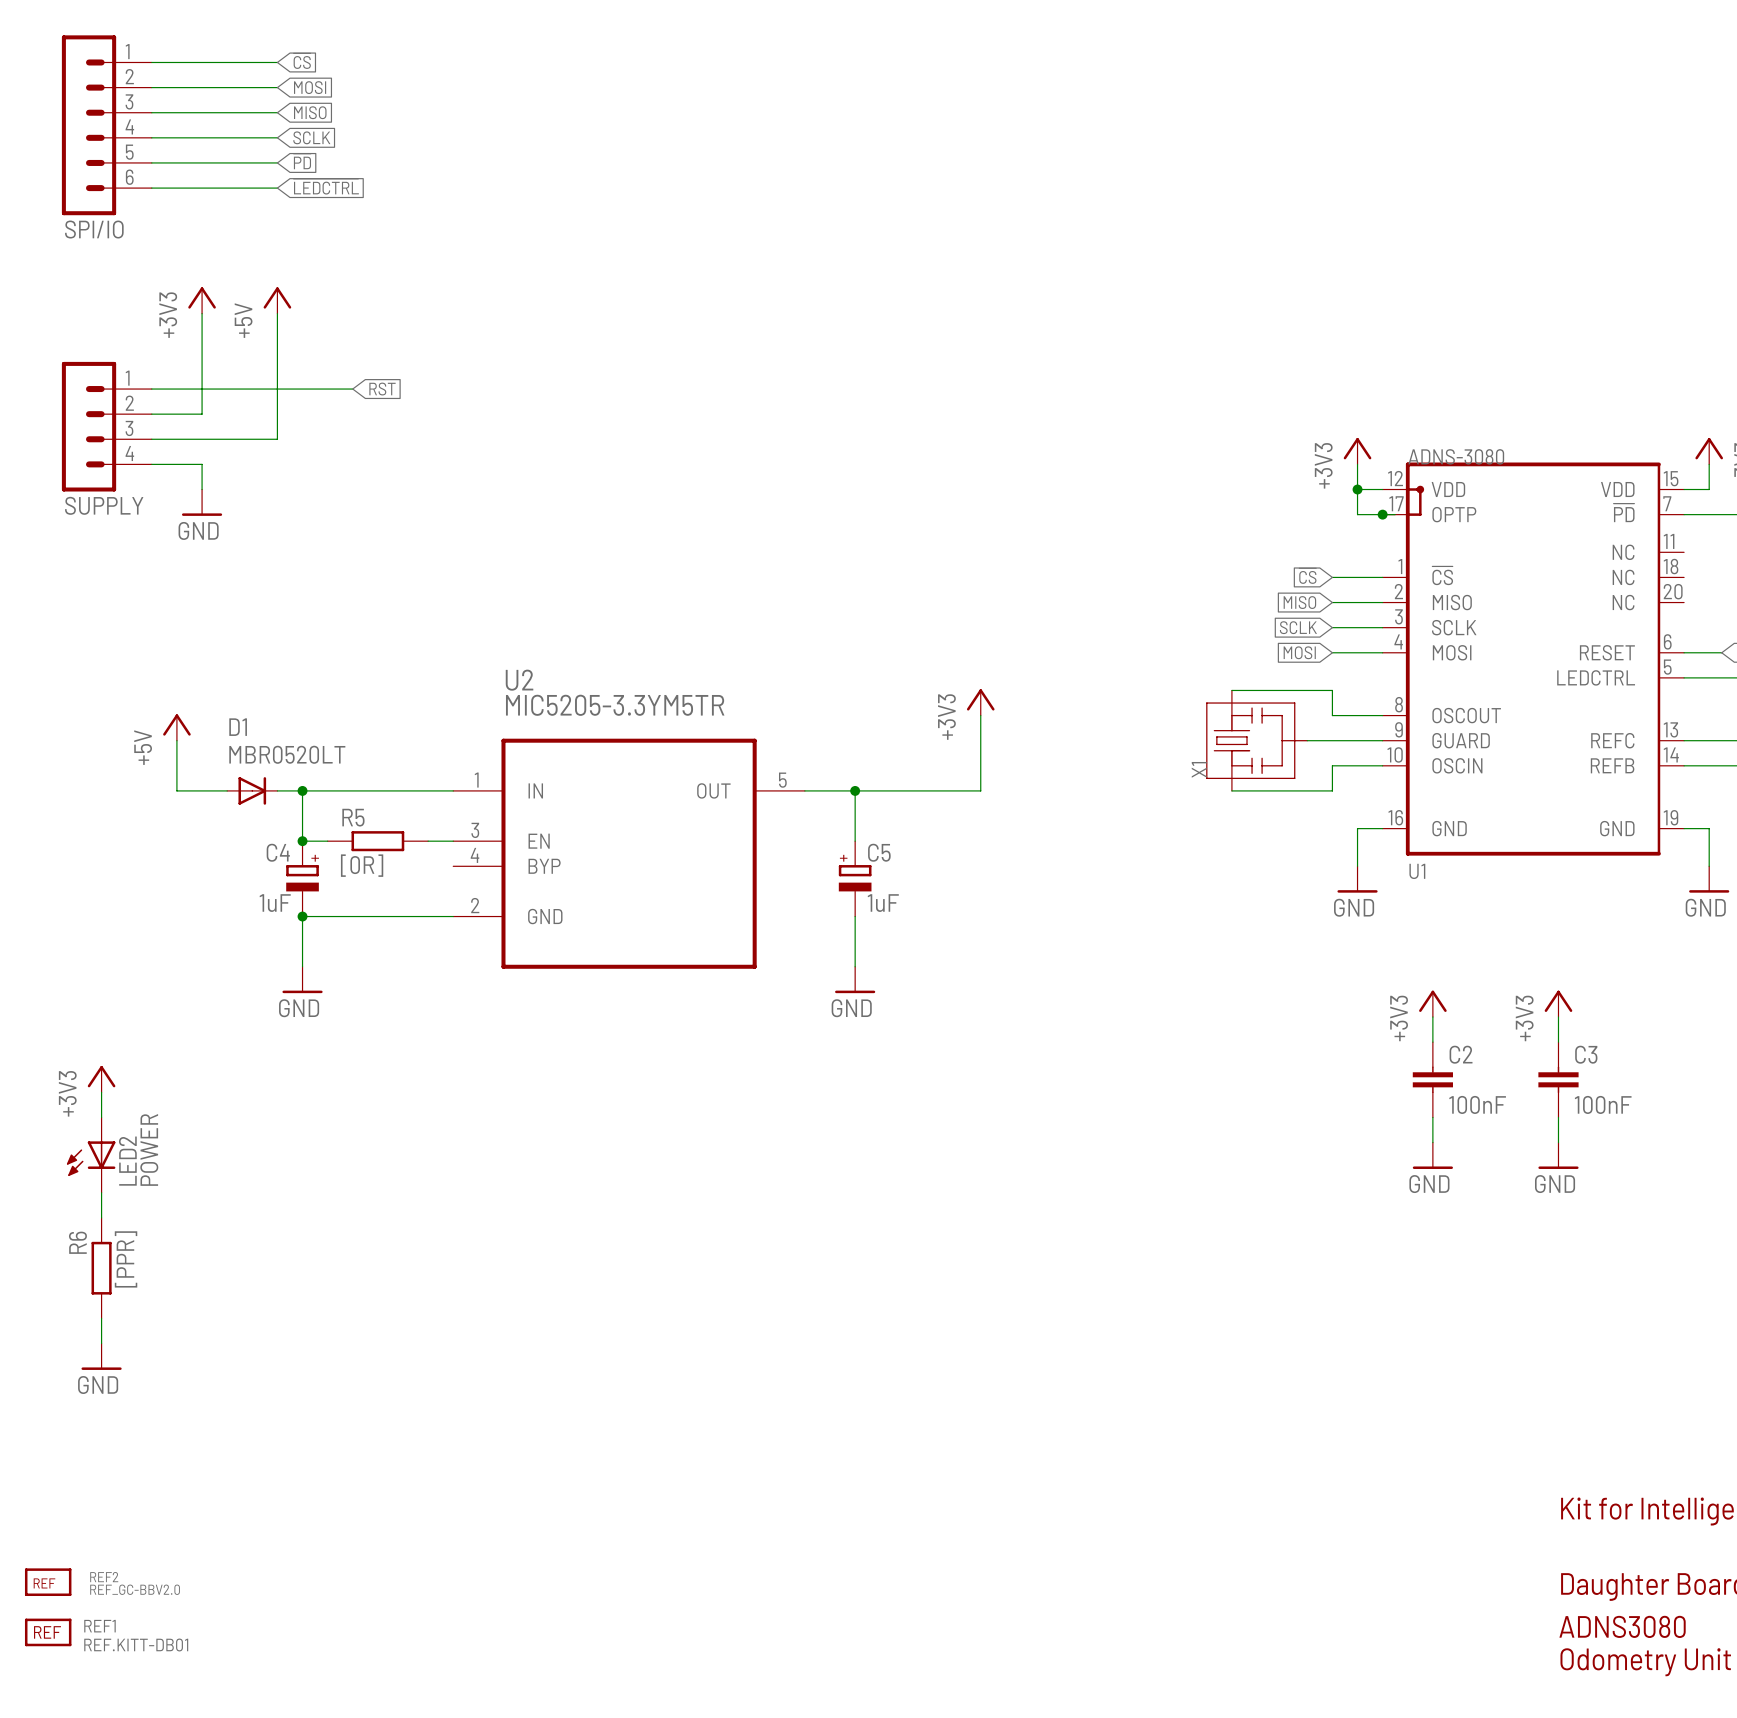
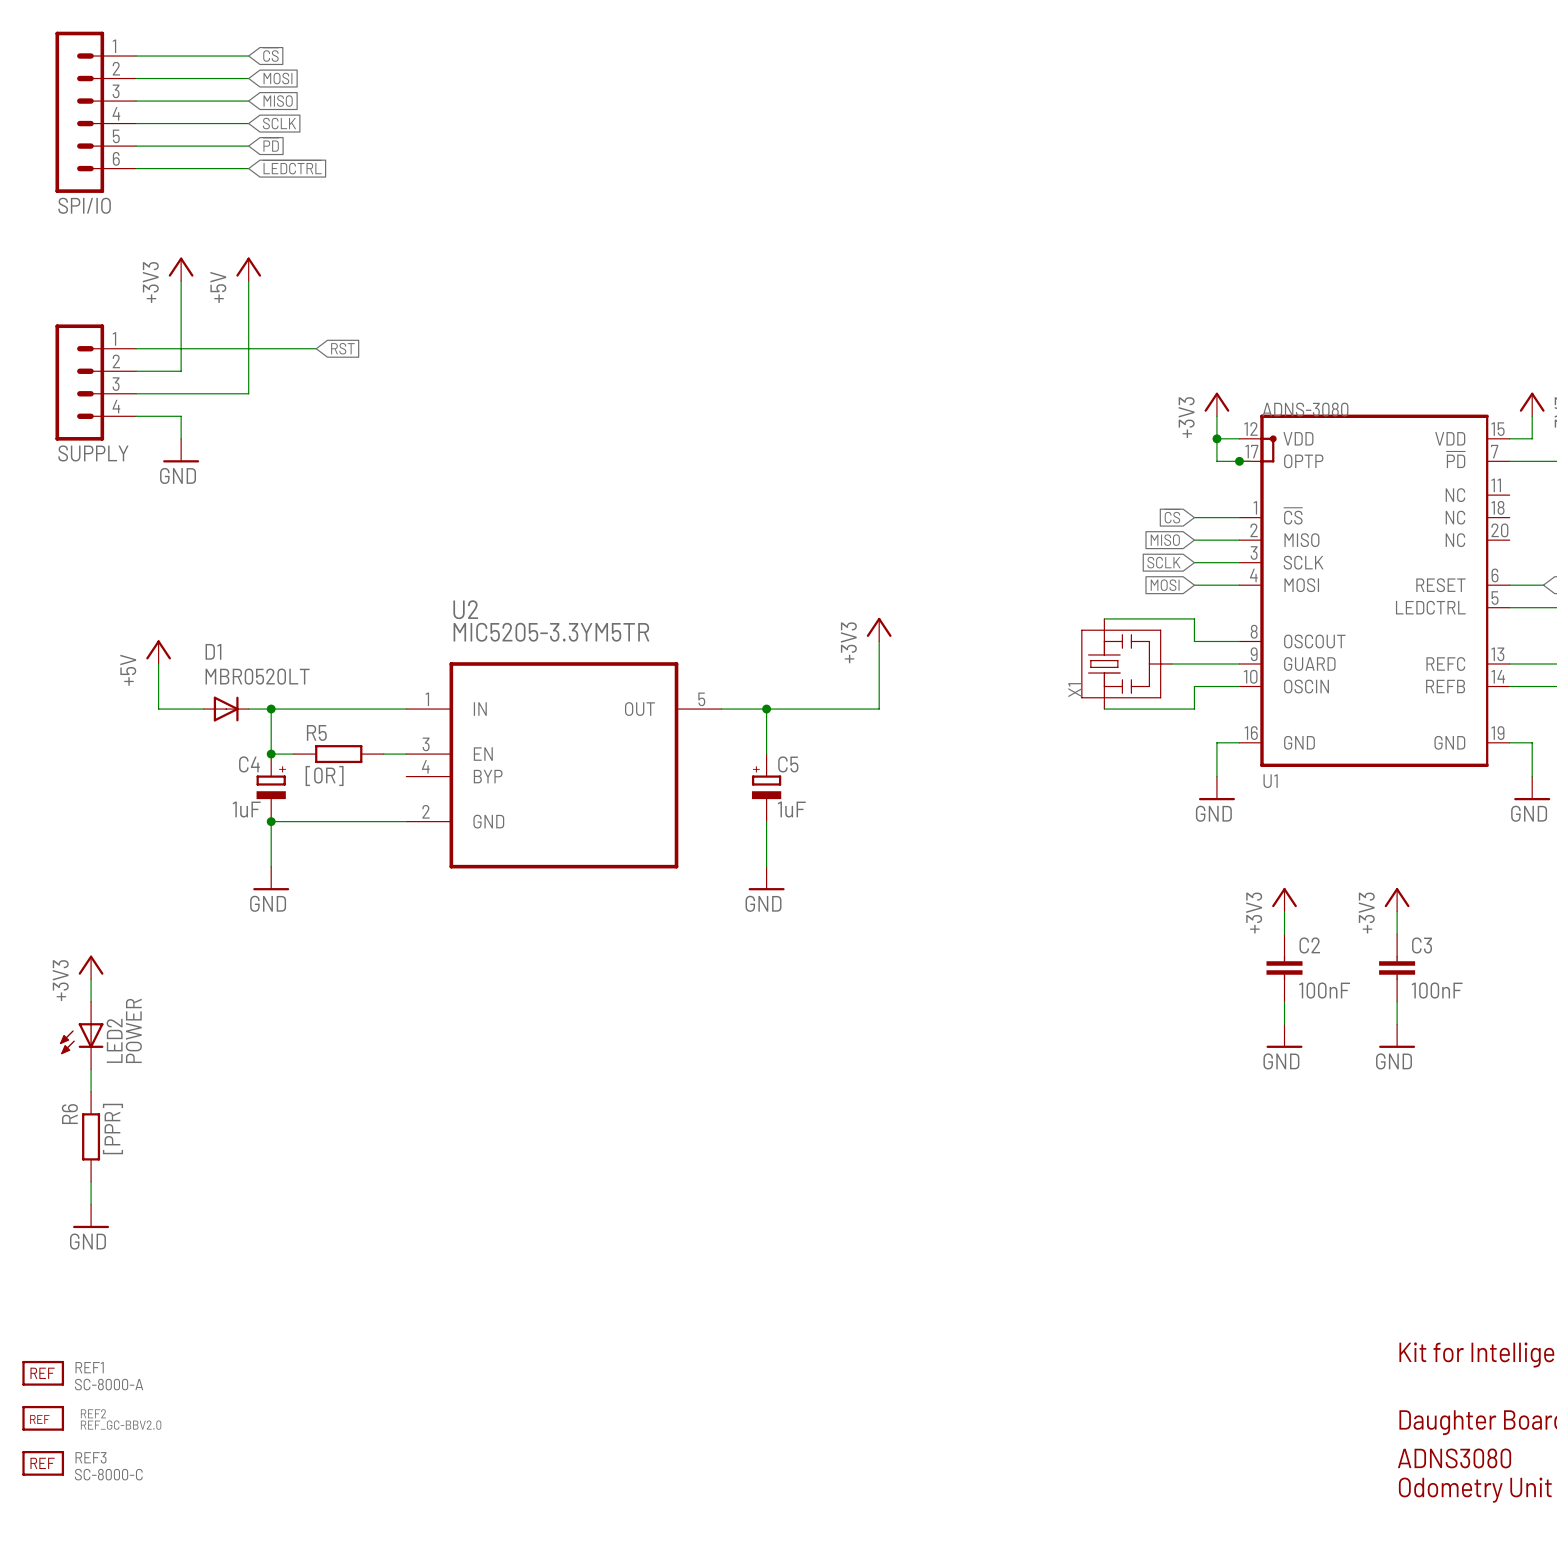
REF1: none -> SC-8000-A (43, 1373)
REF1 name: REF1 (99, 1626) -> REF3 (91, 1457)
REF1 value: REF.KITT-DB01 (136, 1644) -> SC-8000-C (108, 1474)

